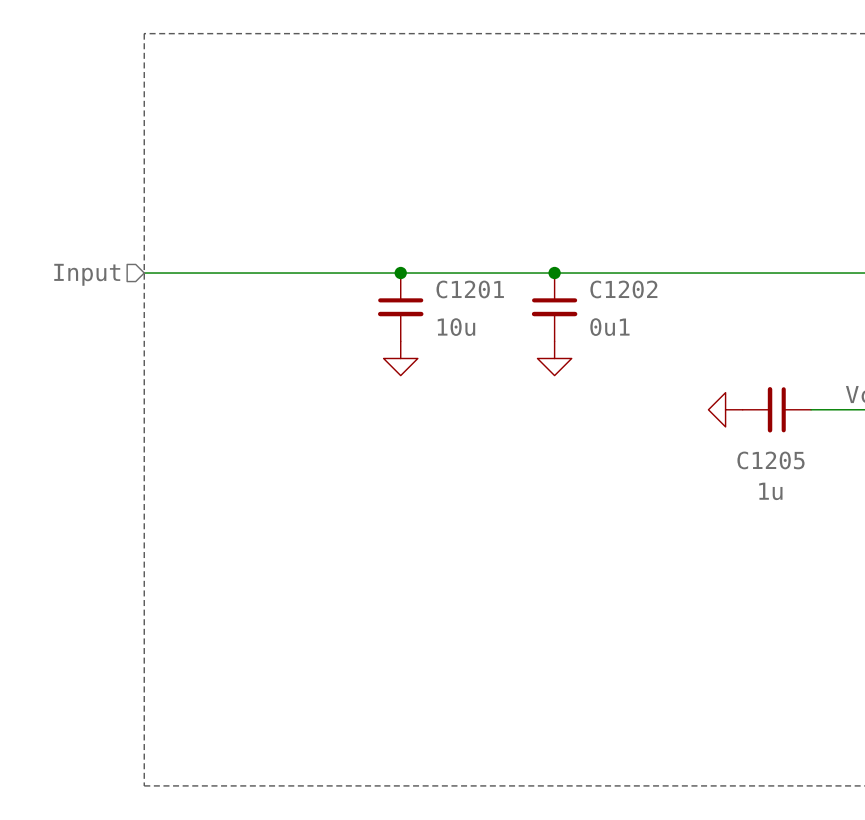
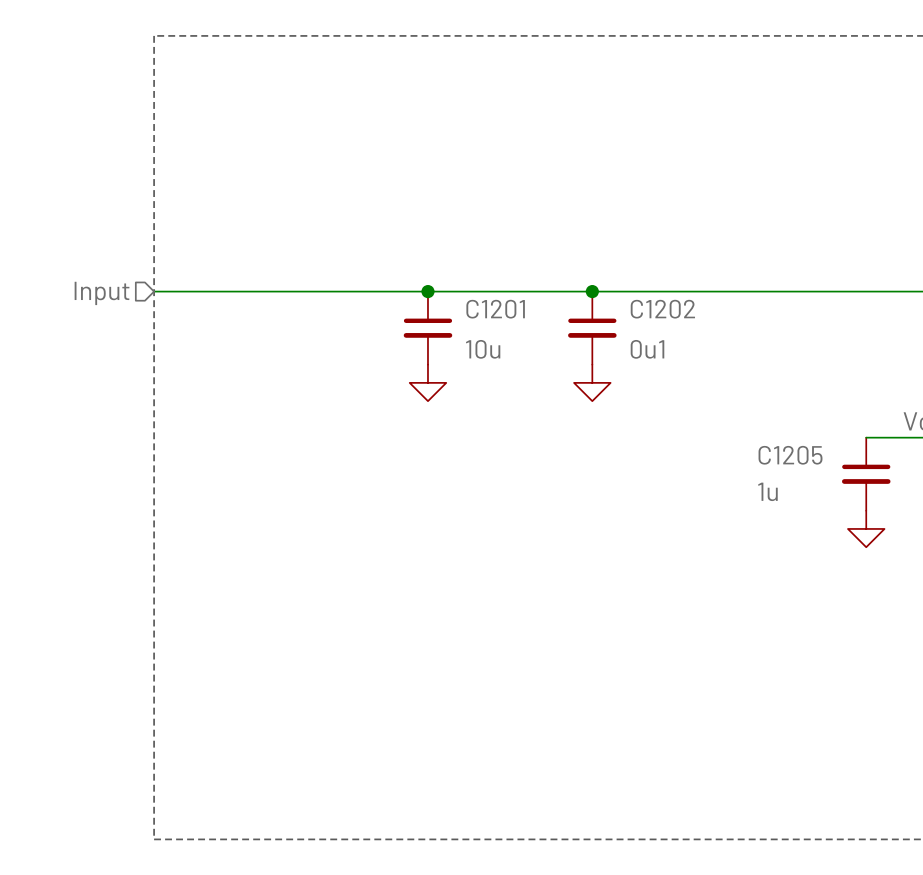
power symbol rotation: 0° (725, 409) -> 90° counterclockwise (866, 528)
power symbol position: (725, 409) -> (866, 528)
C1205 rotation: 0° (776, 409) -> 90° counterclockwise (866, 474)
C1205 position: (776, 409) -> (866, 474)
C1205 name position: C1205 (770, 460) -> C1205 (790, 455)
C1205 value position: 1u (770, 491) -> 1u (767, 491)

